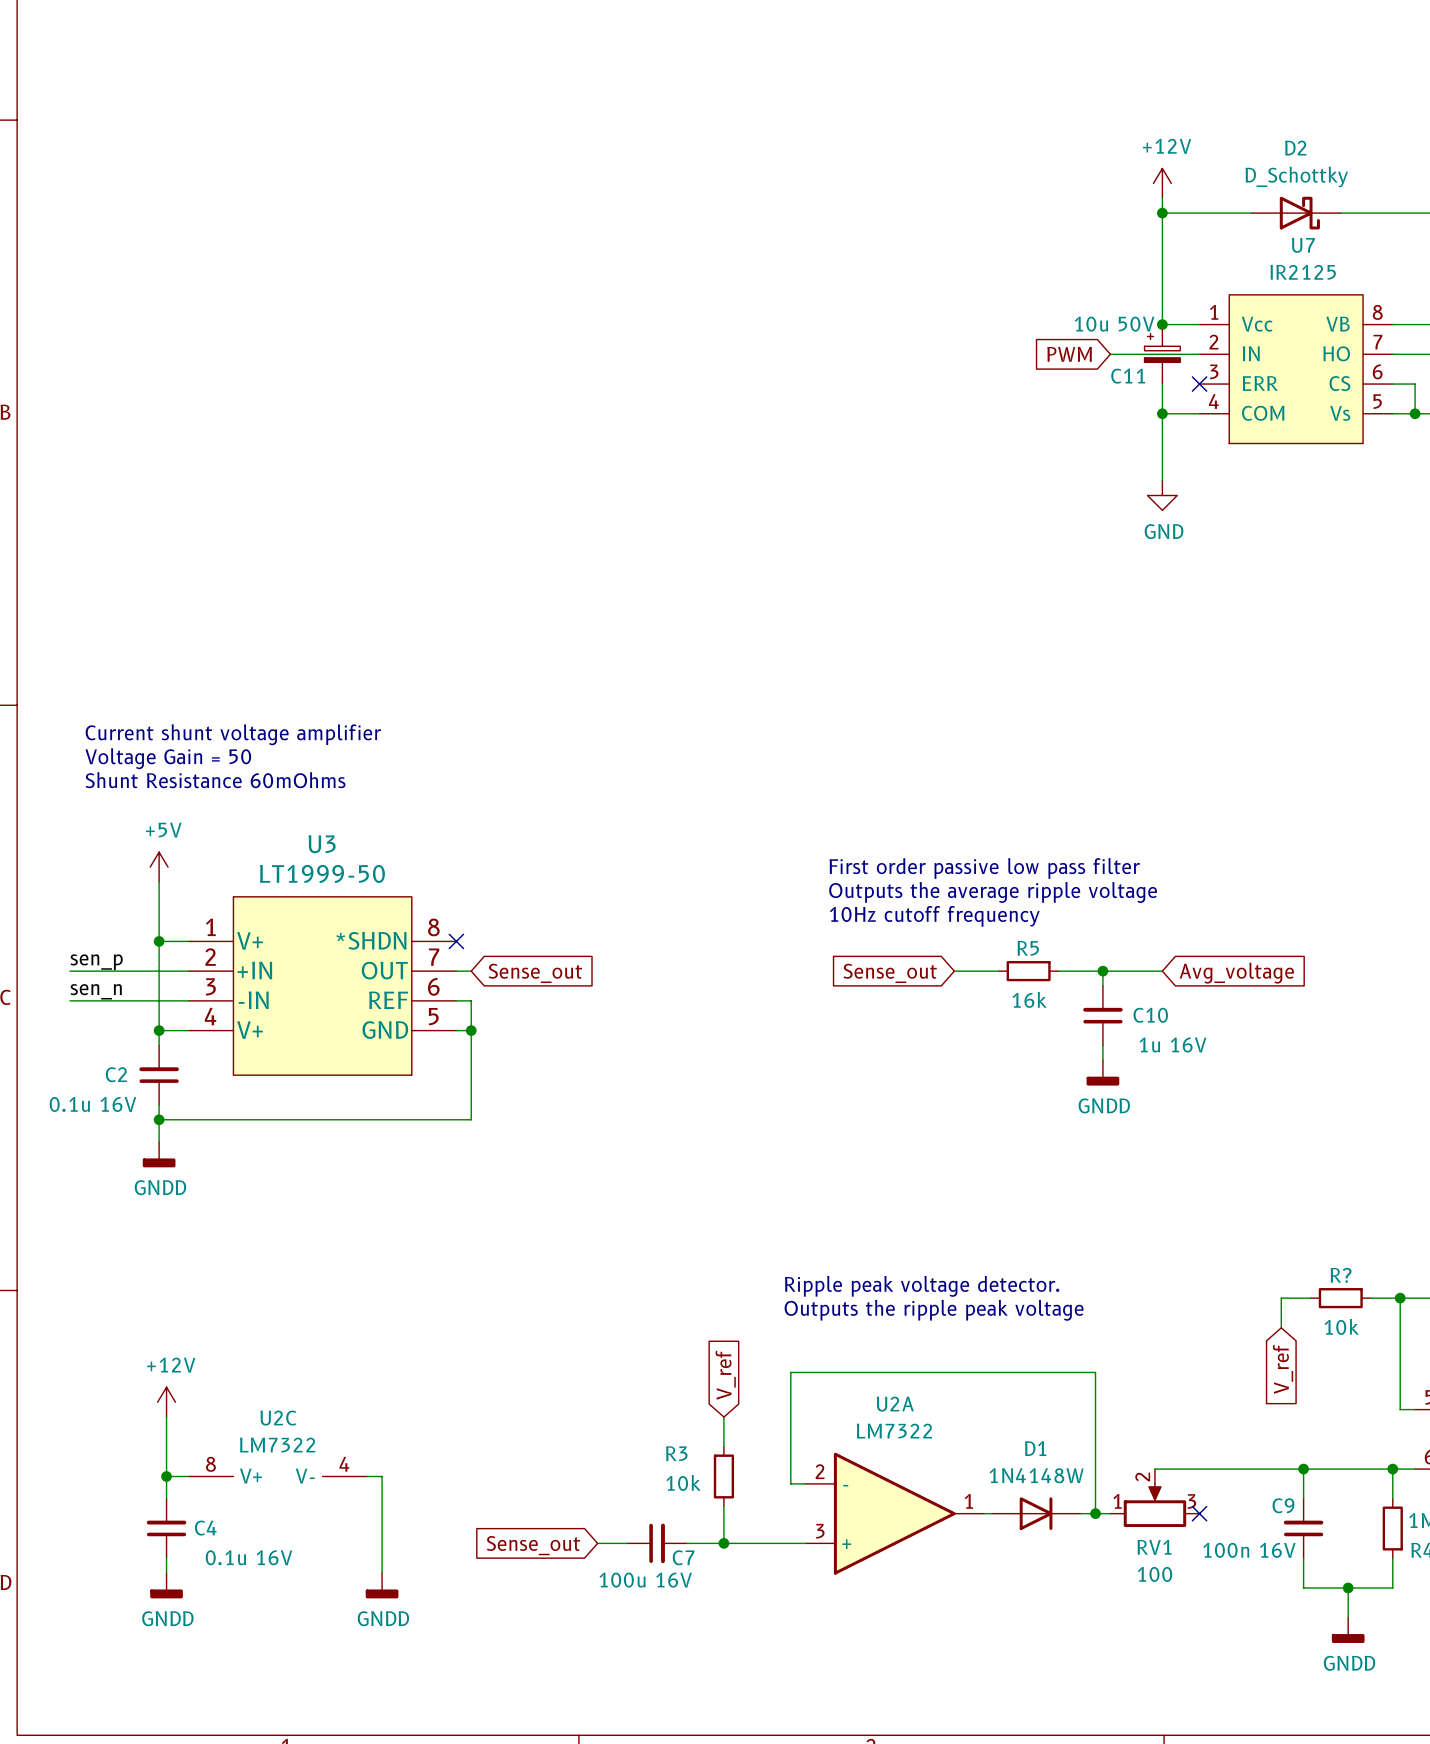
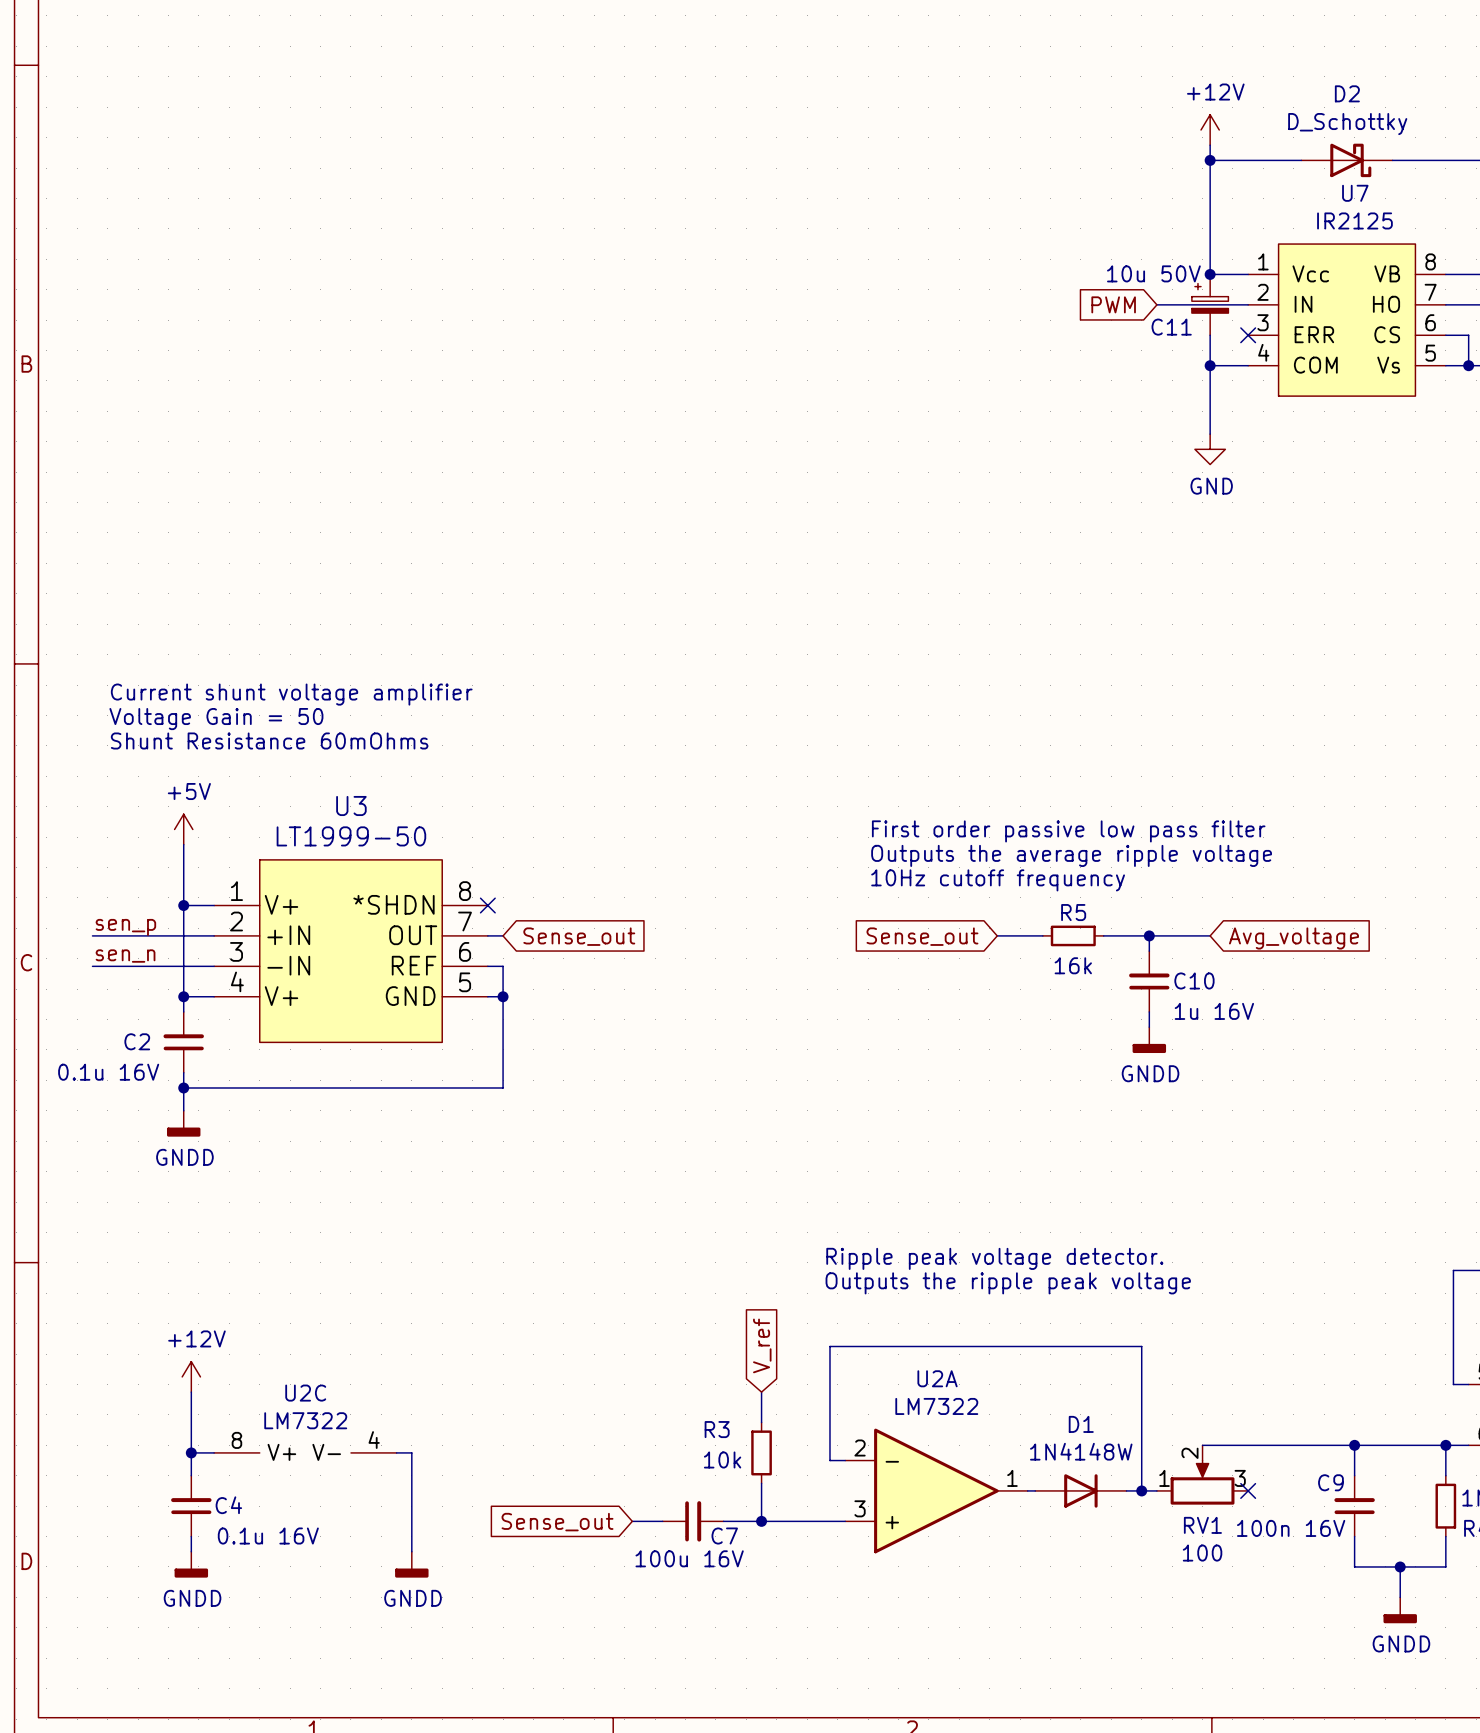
wire: (1311, 1298) (1281, 1298) (1281, 1327) -> none
R?: 10k (1340, 1298) -> none
wire: (1370, 1298) (1400, 1298) -> none
junction: (1400, 1298) -> none
global label: V_ref (1283, 1369) -> none

